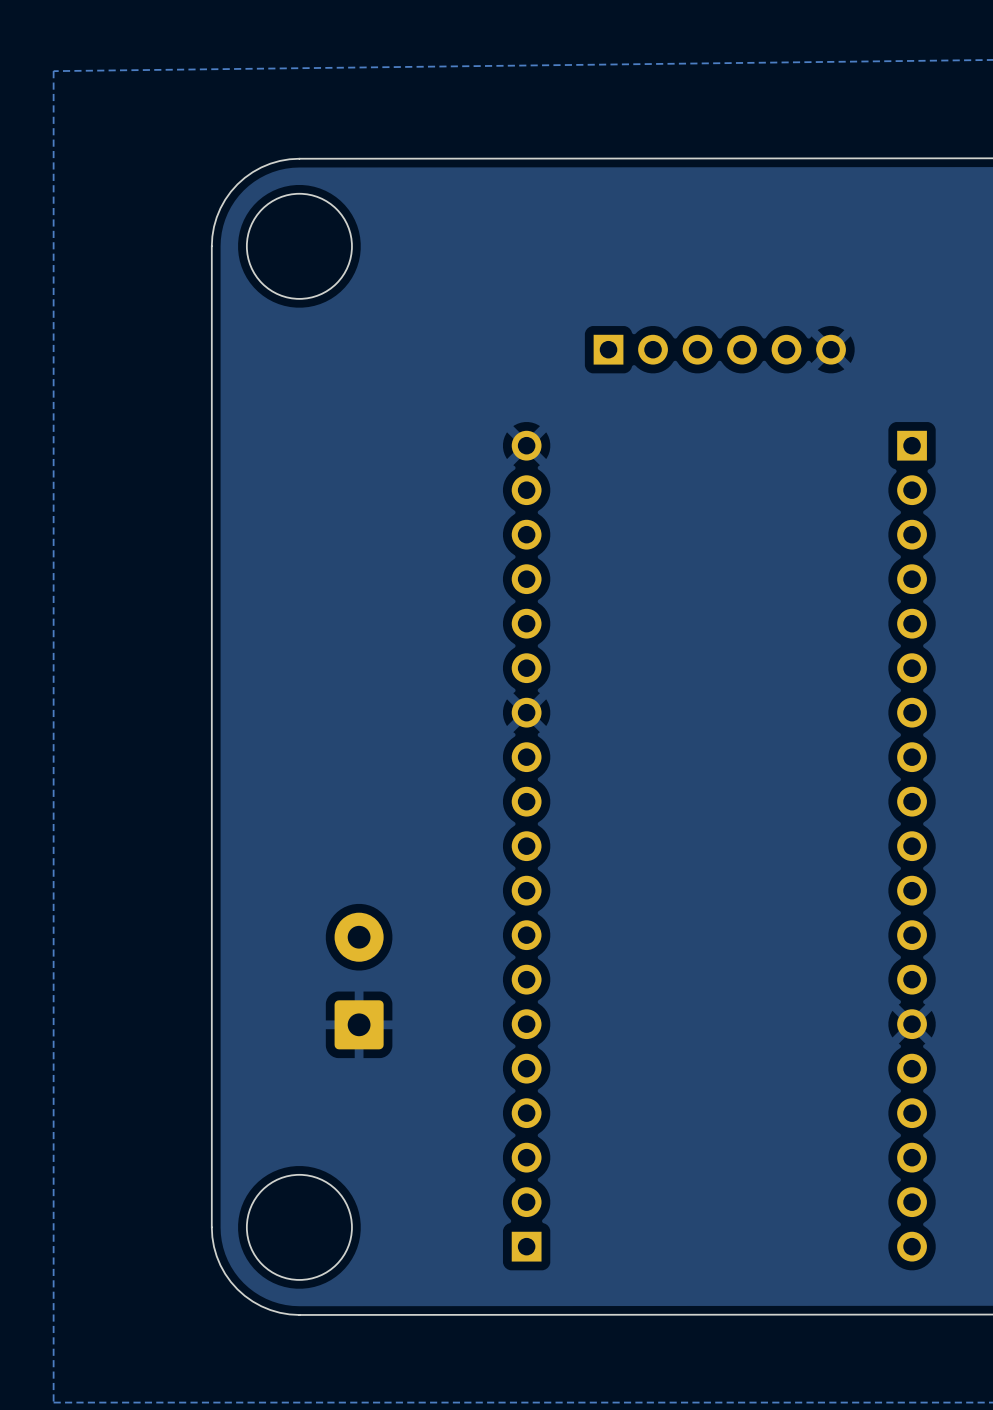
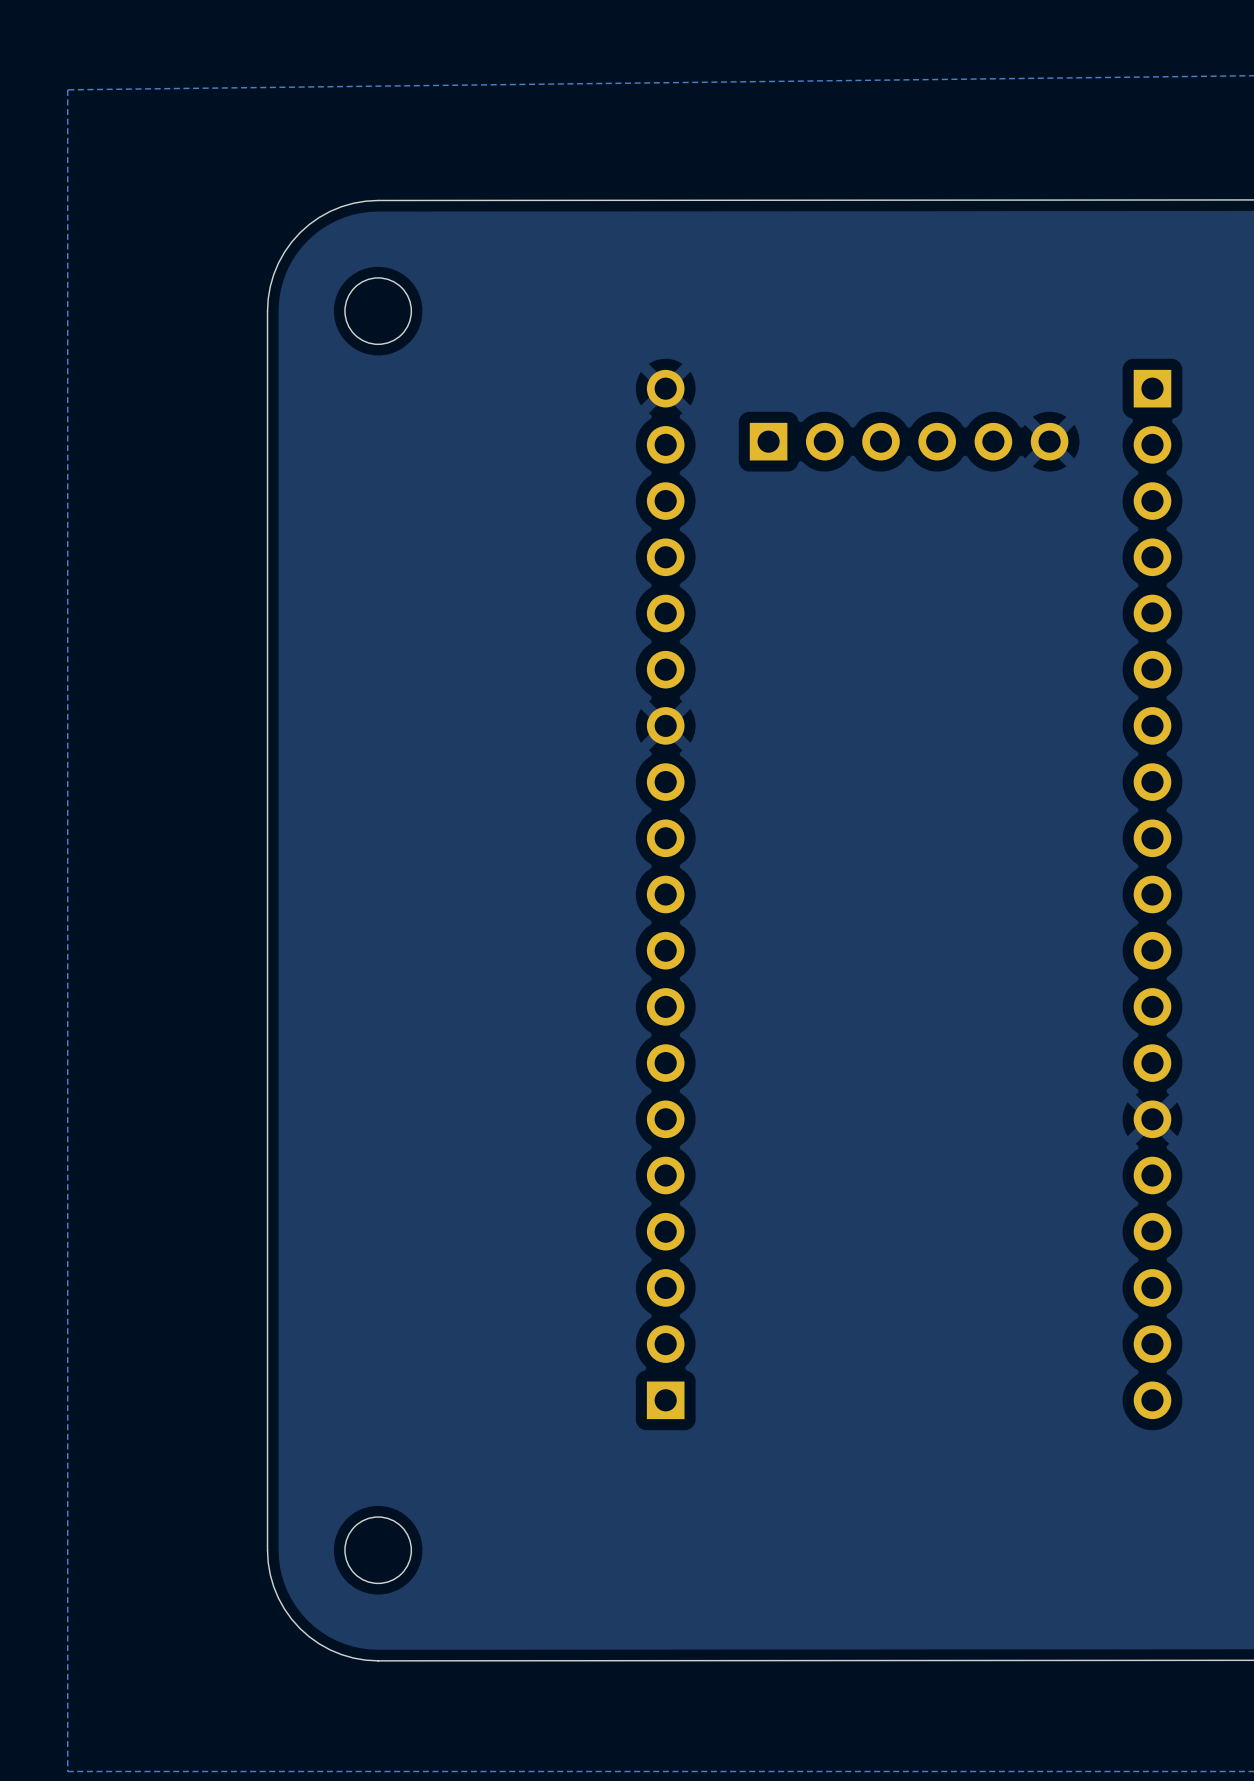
round board edge size: [246, 193, 353, 300] -> [344, 277, 412, 345]
part position: (526, 846) -> (665, 894)
part position: (912, 846) -> (1152, 894)
part: (359, 981) -> none
round board edge size: [246, 1174, 353, 1281] -> [344, 1516, 412, 1584]

